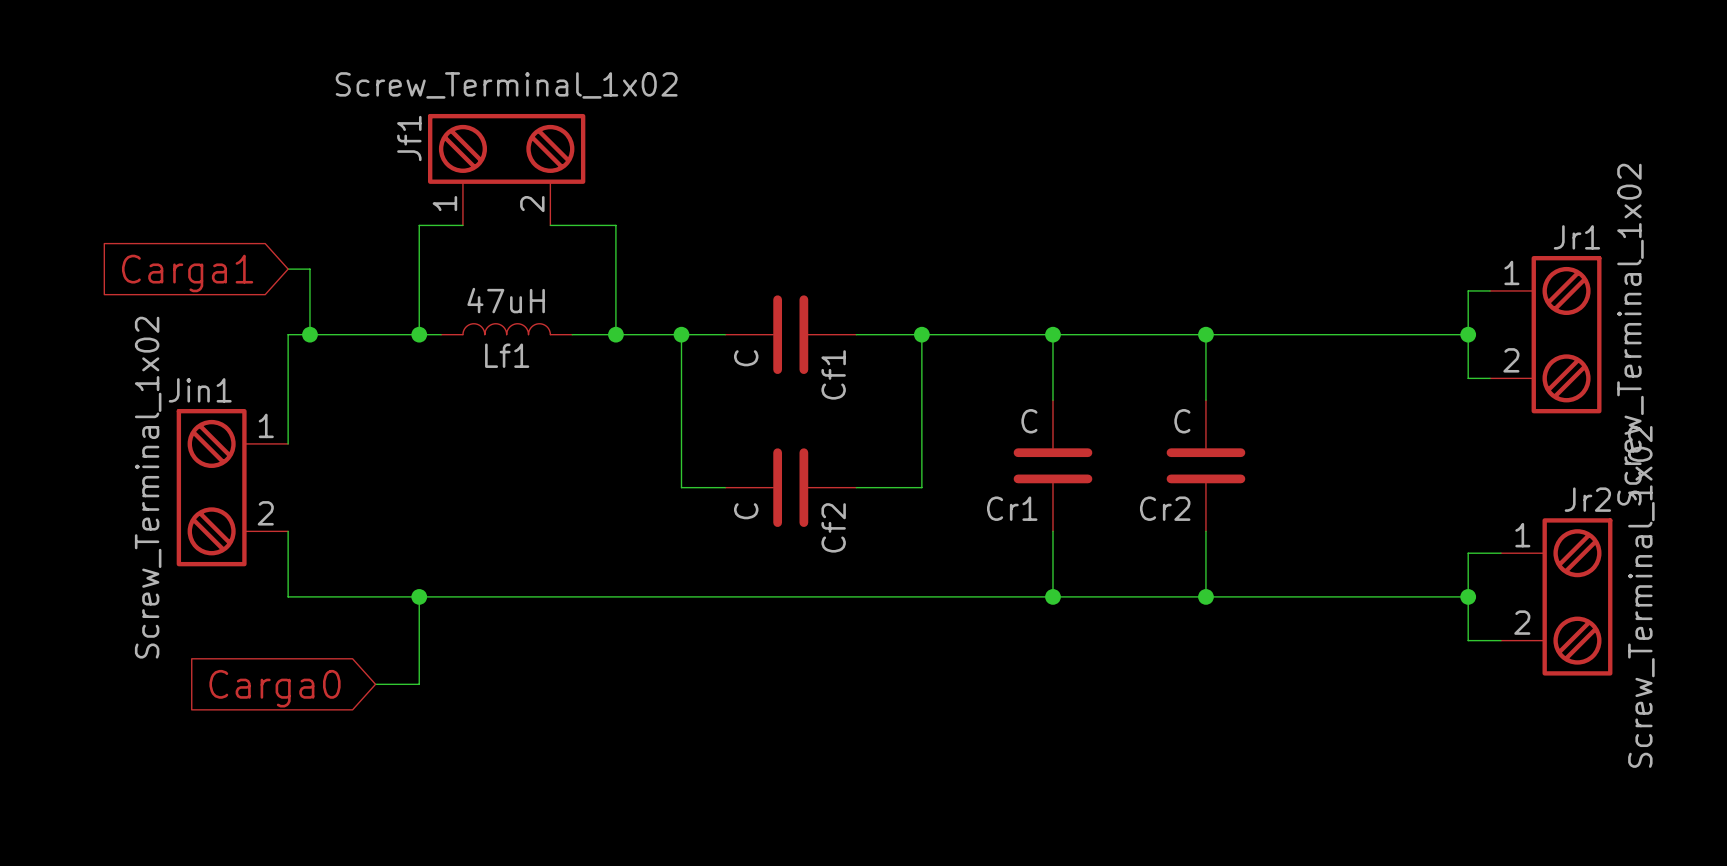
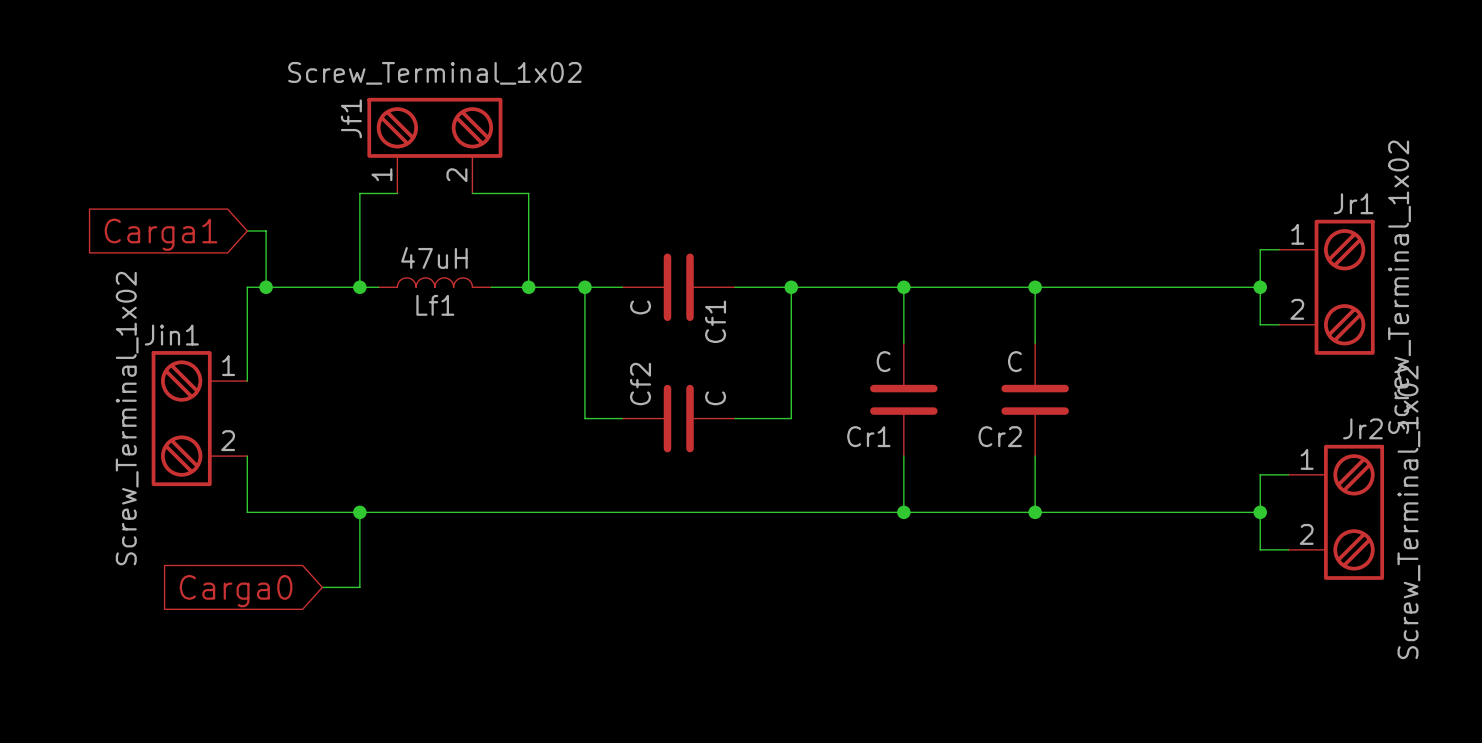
Cf2 value position: C (746, 511) -> C (715, 398)
Cf2 name position: Cf2 (833, 527) -> Cf2 (640, 384)

